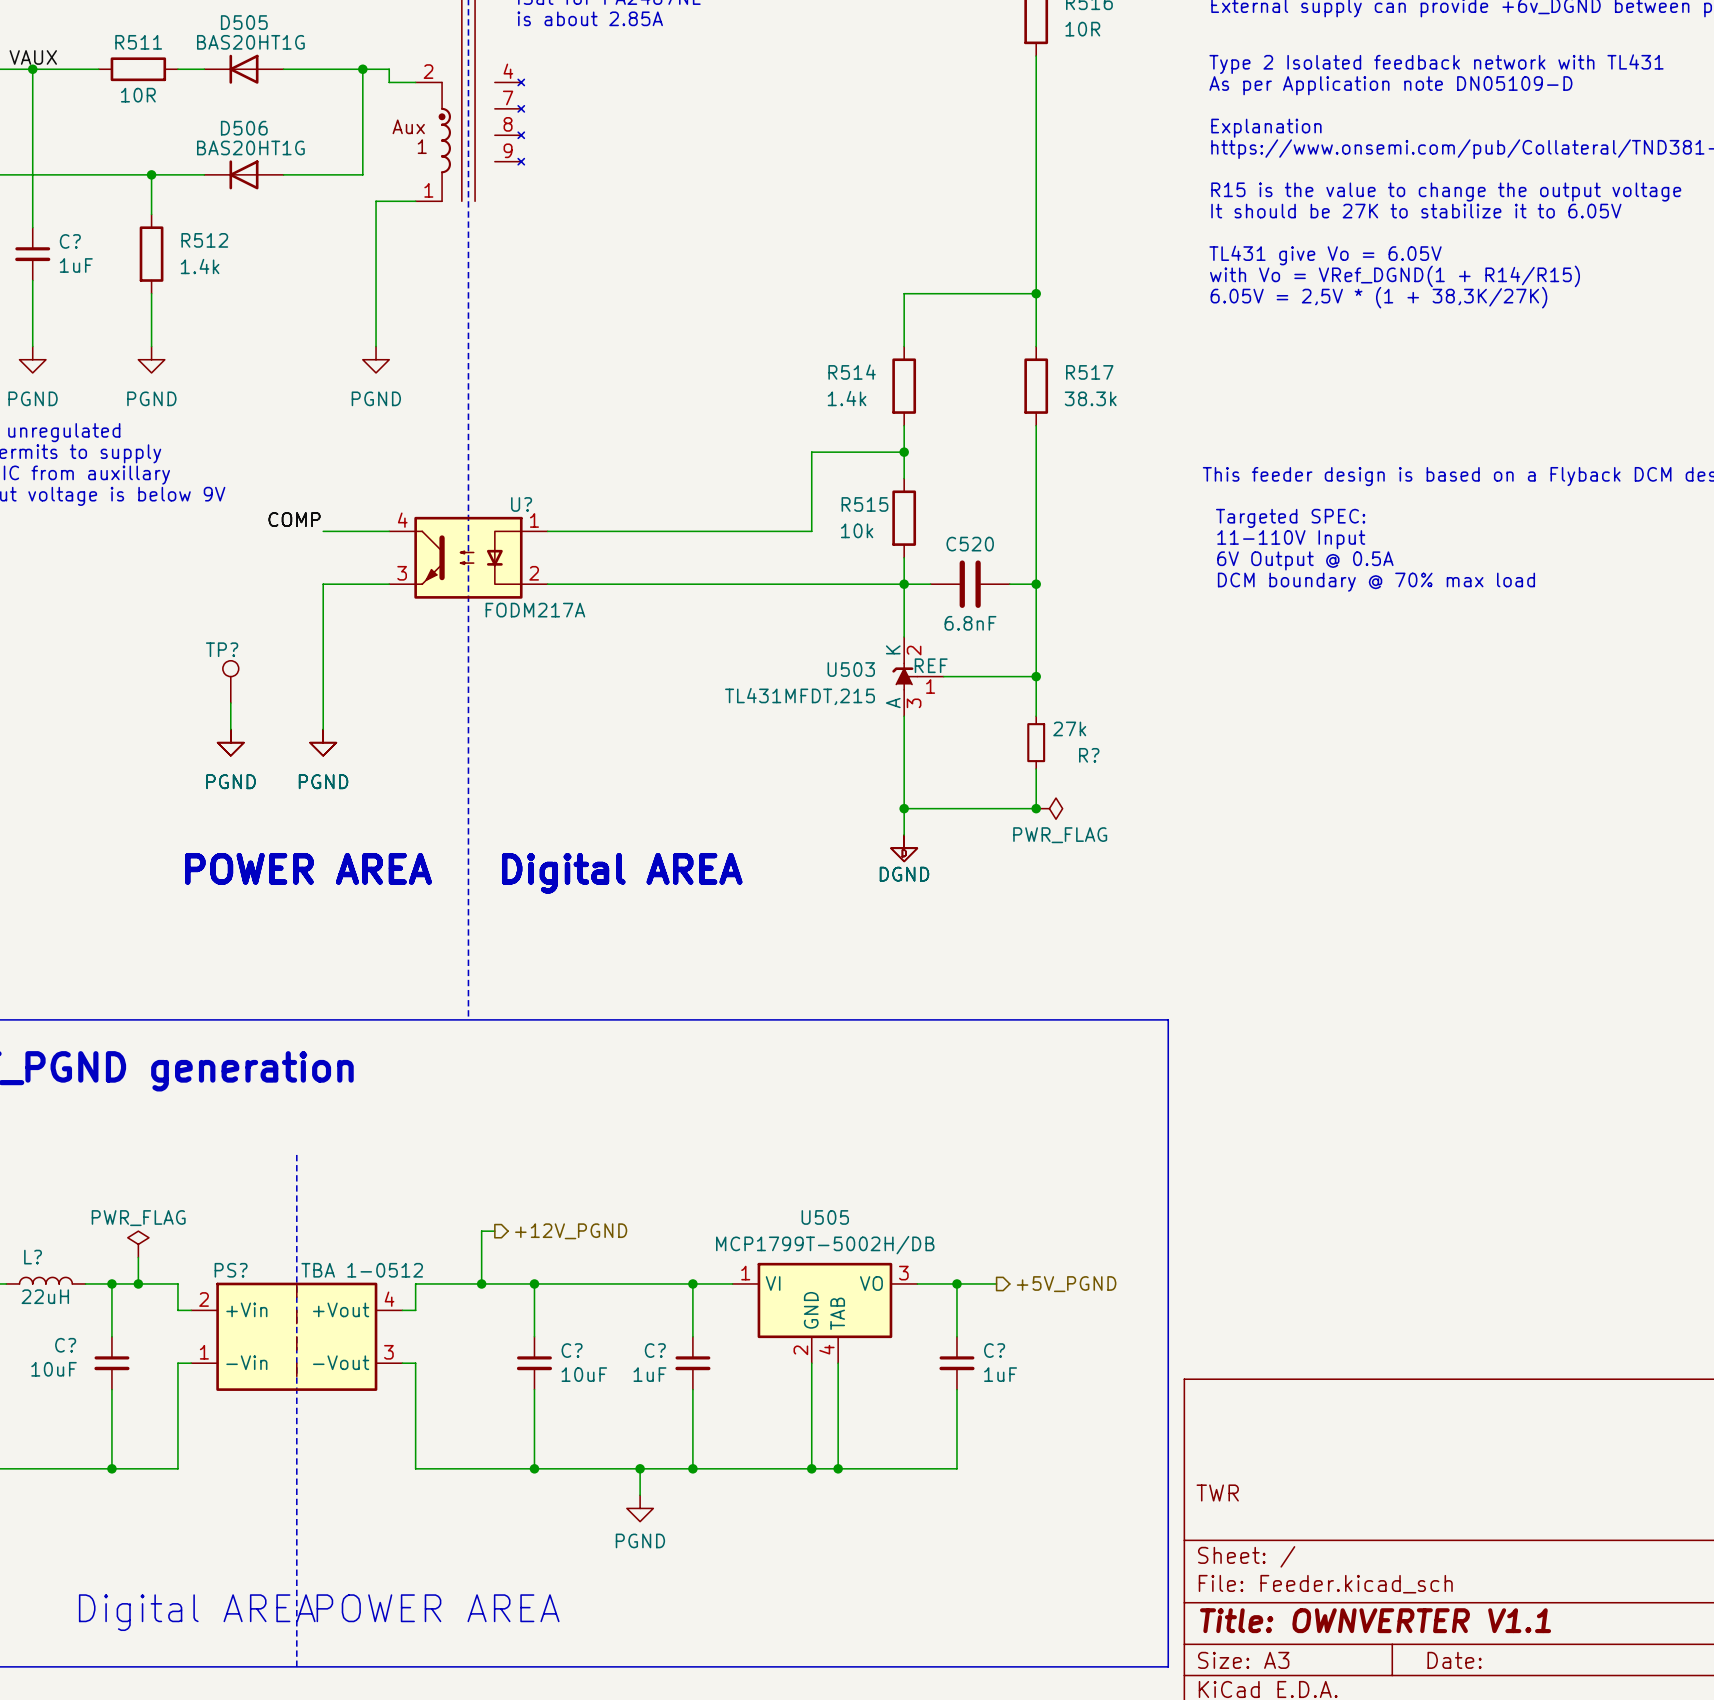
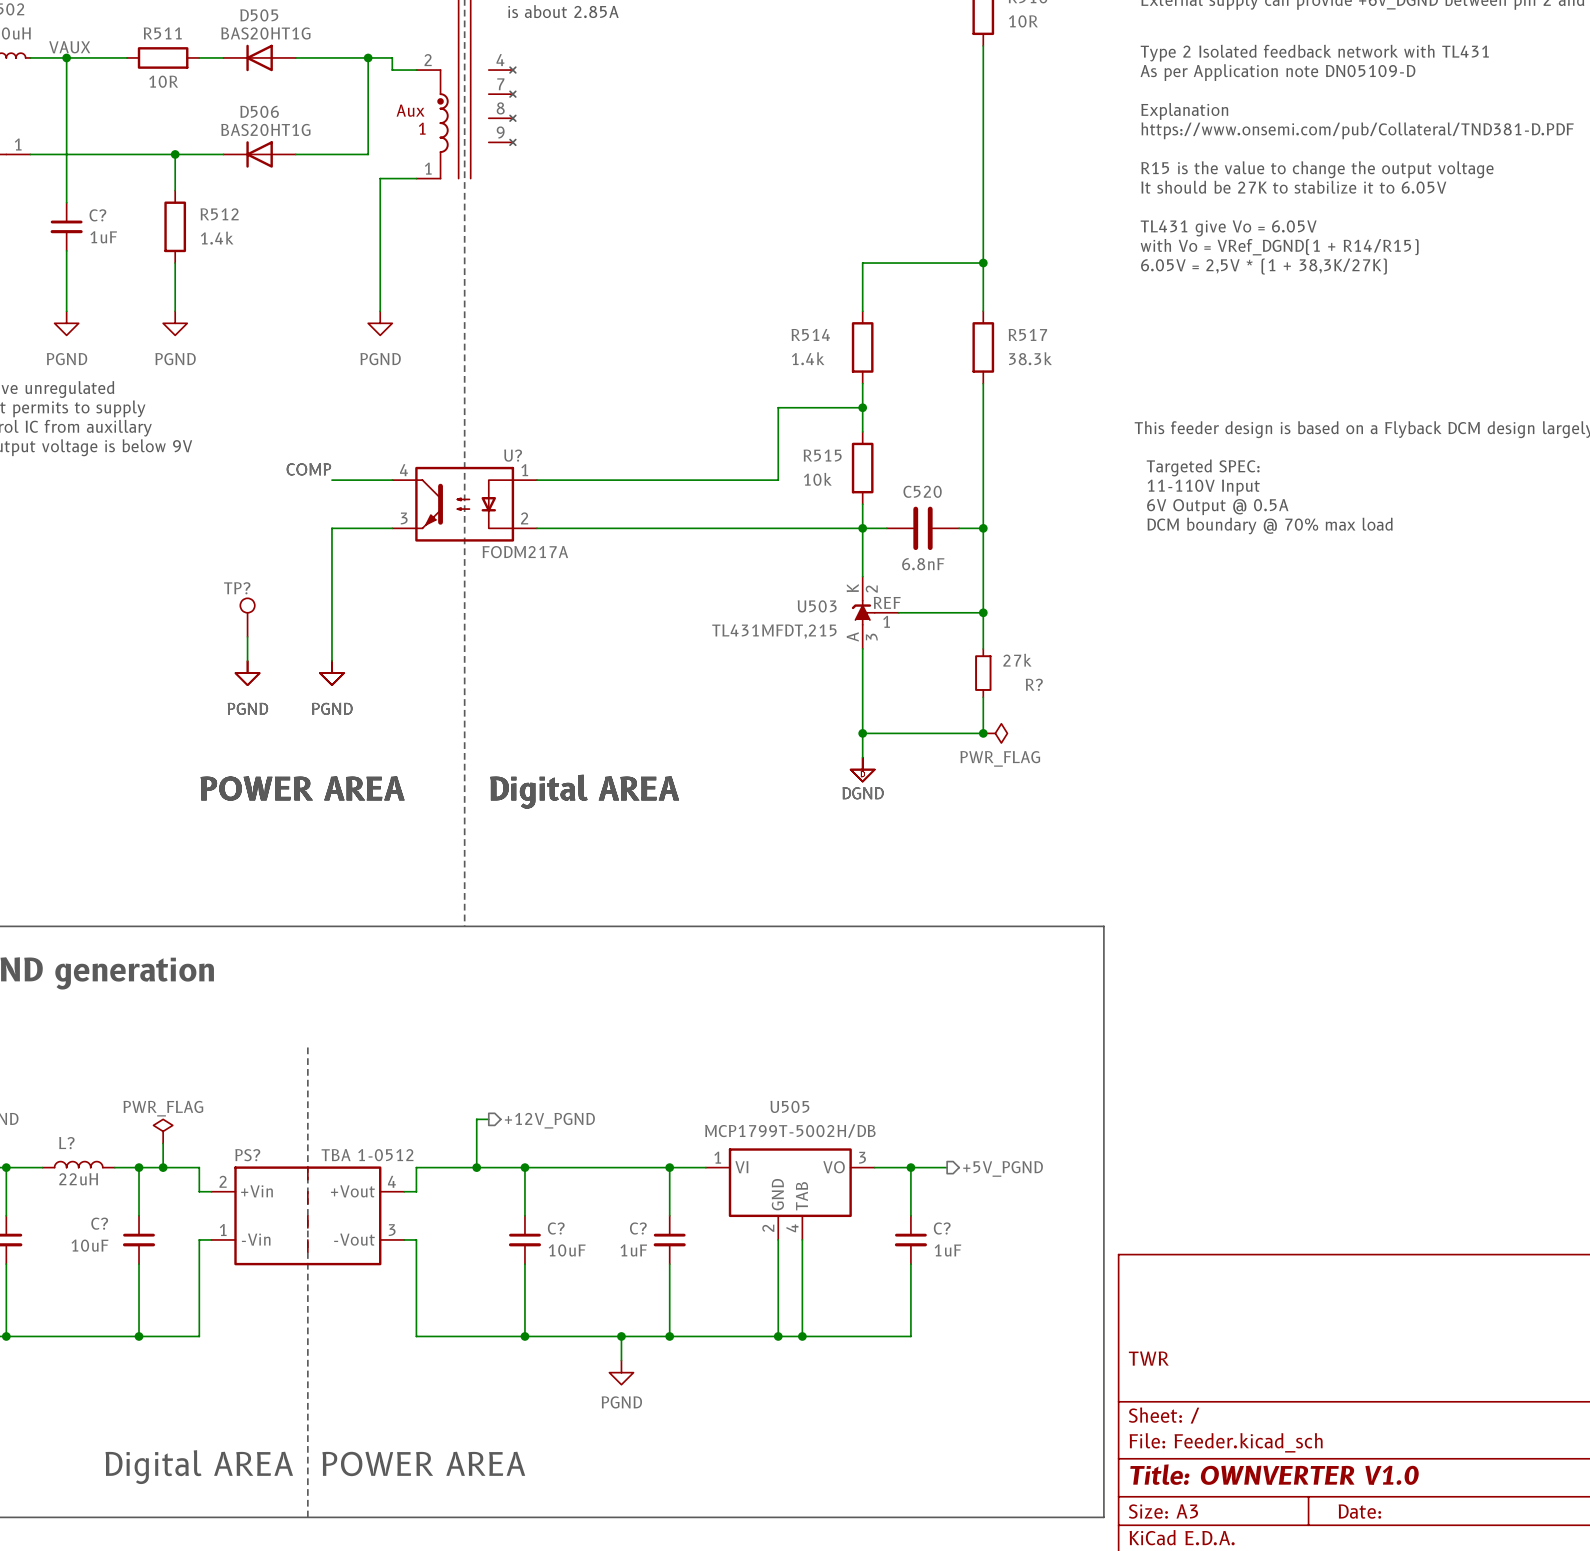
title block: Title: OWNVERTER V1.1 (1375, 1620) -> Title: OWNVERTER V1.0 (1274, 1474)

